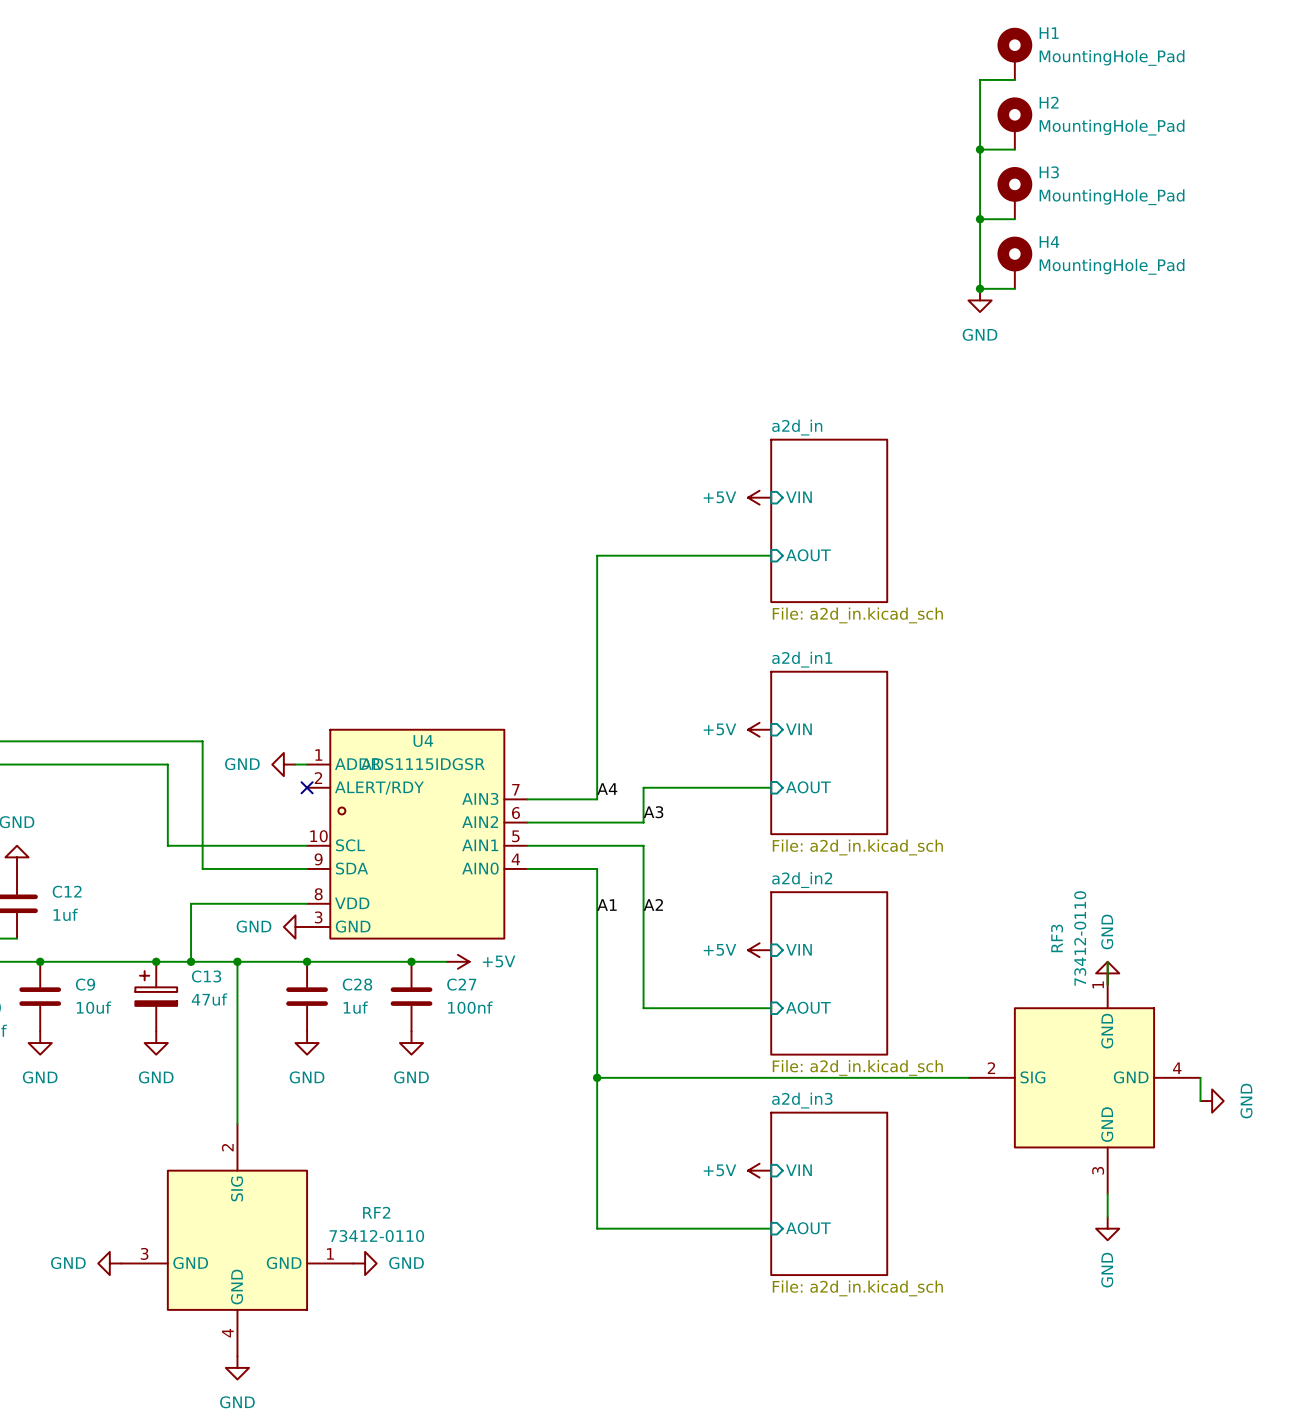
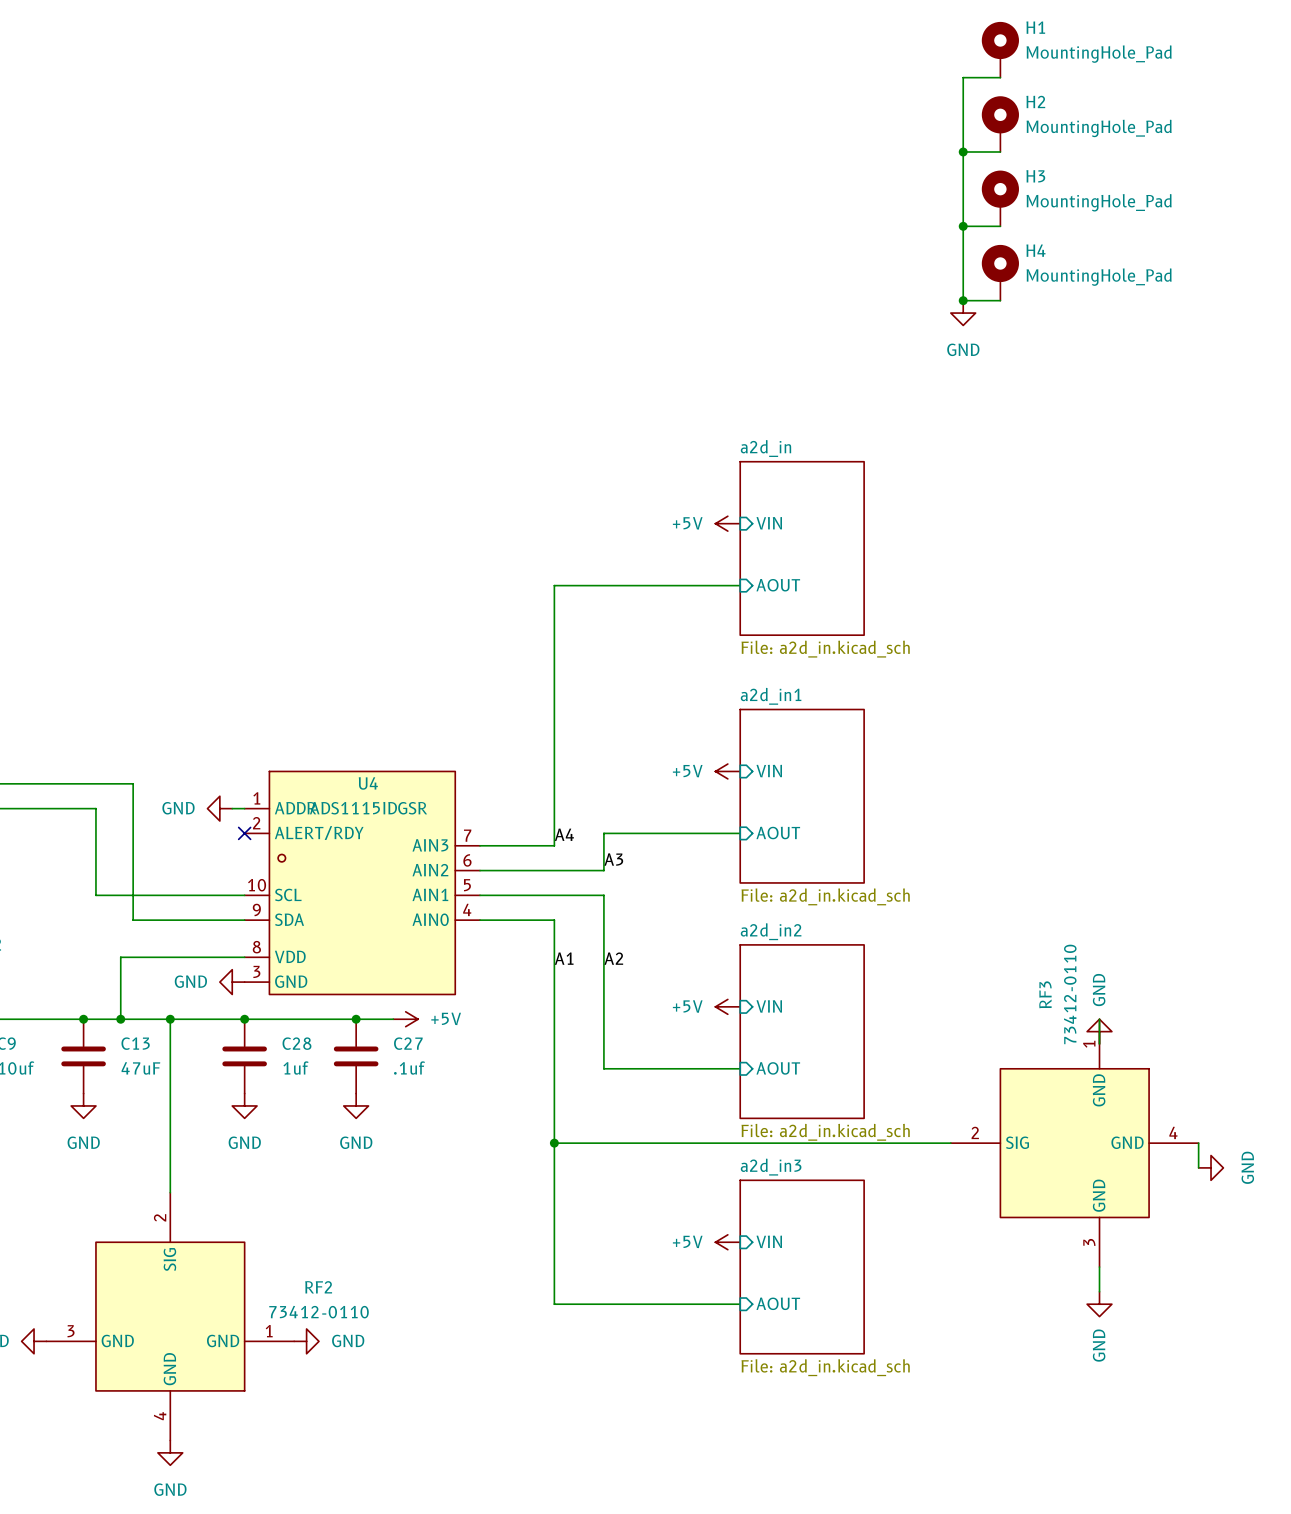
C13 symbol: [135, 961, 178, 1032] -> [61, 1019, 106, 1094]
C13 value: 47uf (209, 999) -> 47uF (140, 1068)
C27 value: 100nf (470, 1007) -> .1uf (409, 1068)

